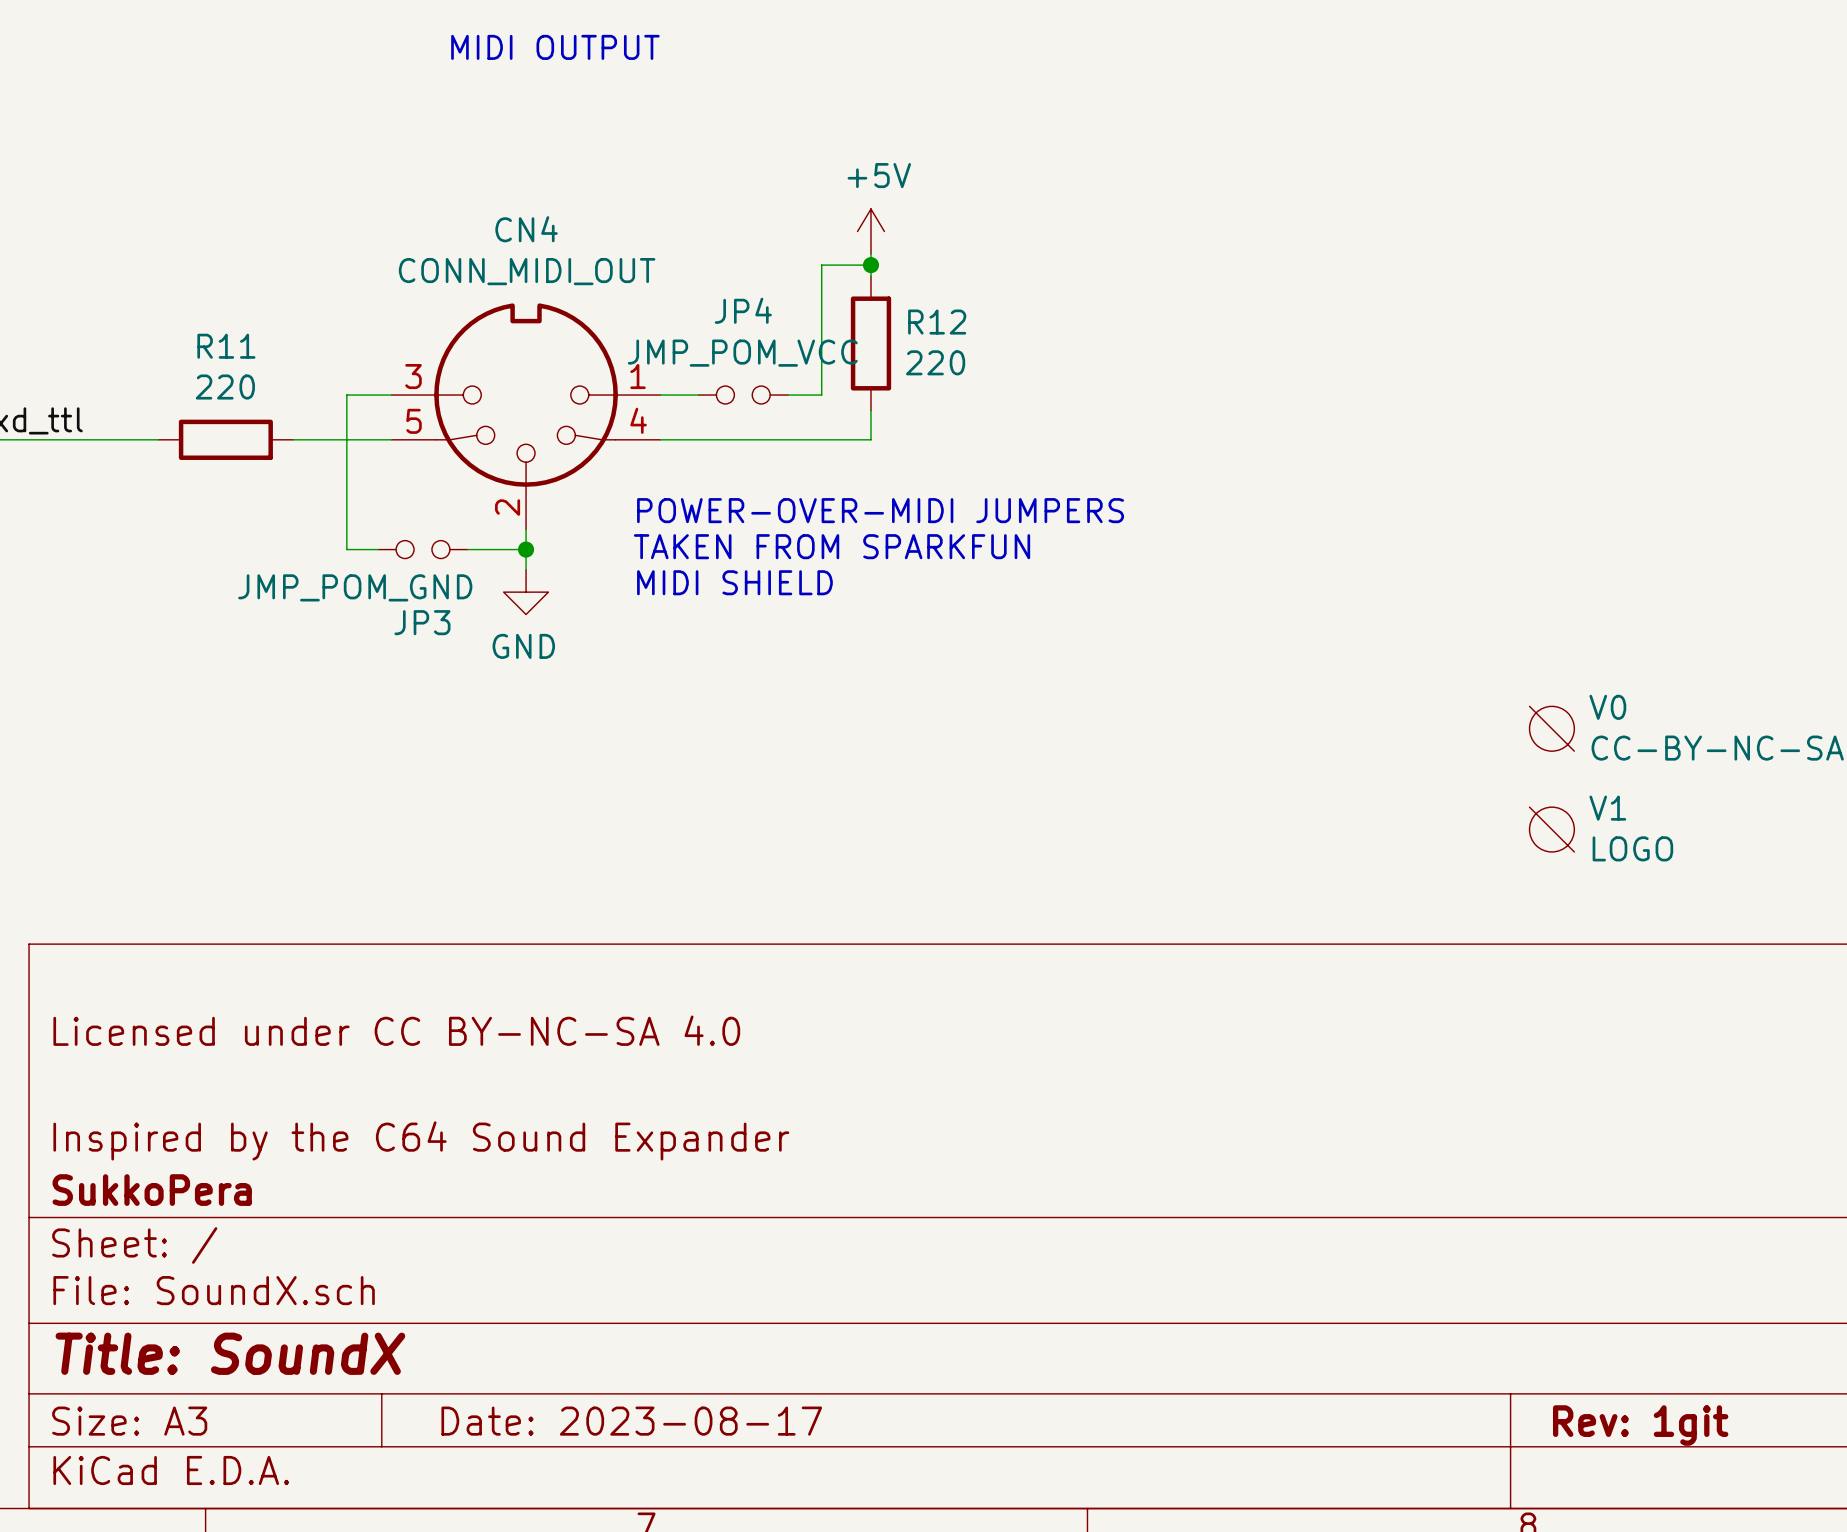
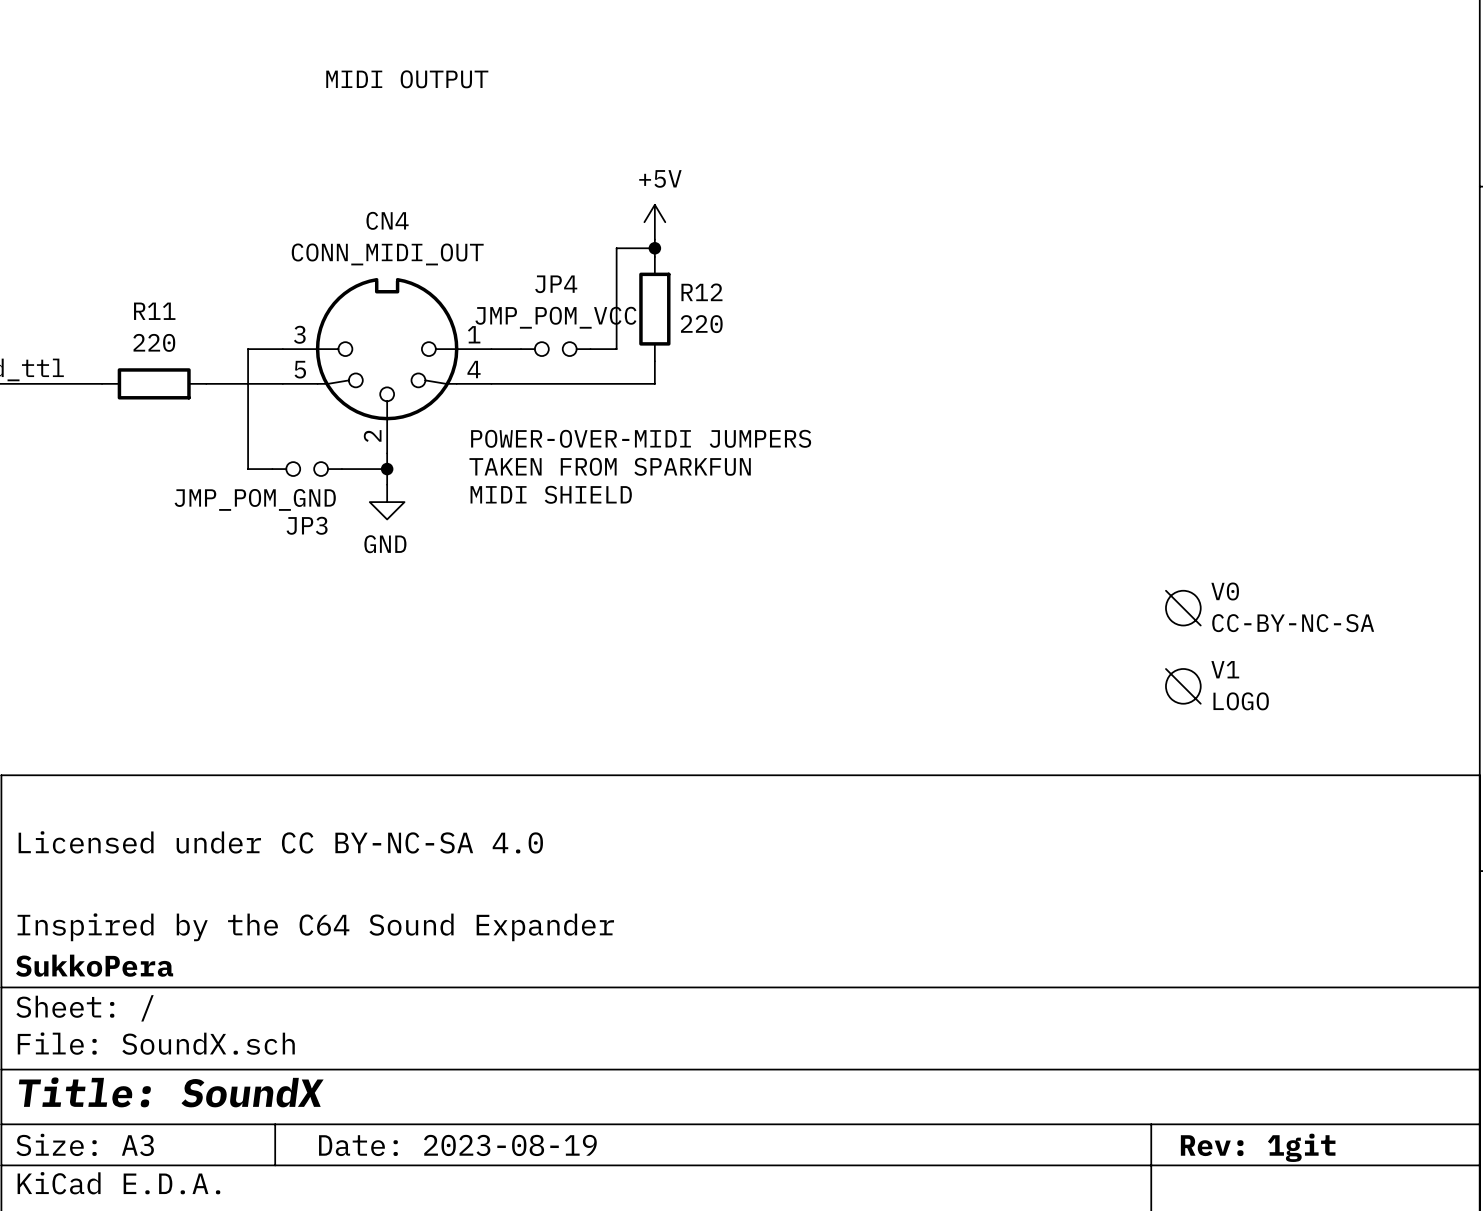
title block: Date: 2023-08-17 (631, 1421) -> Date: 2023-08-19 (457, 1145)

